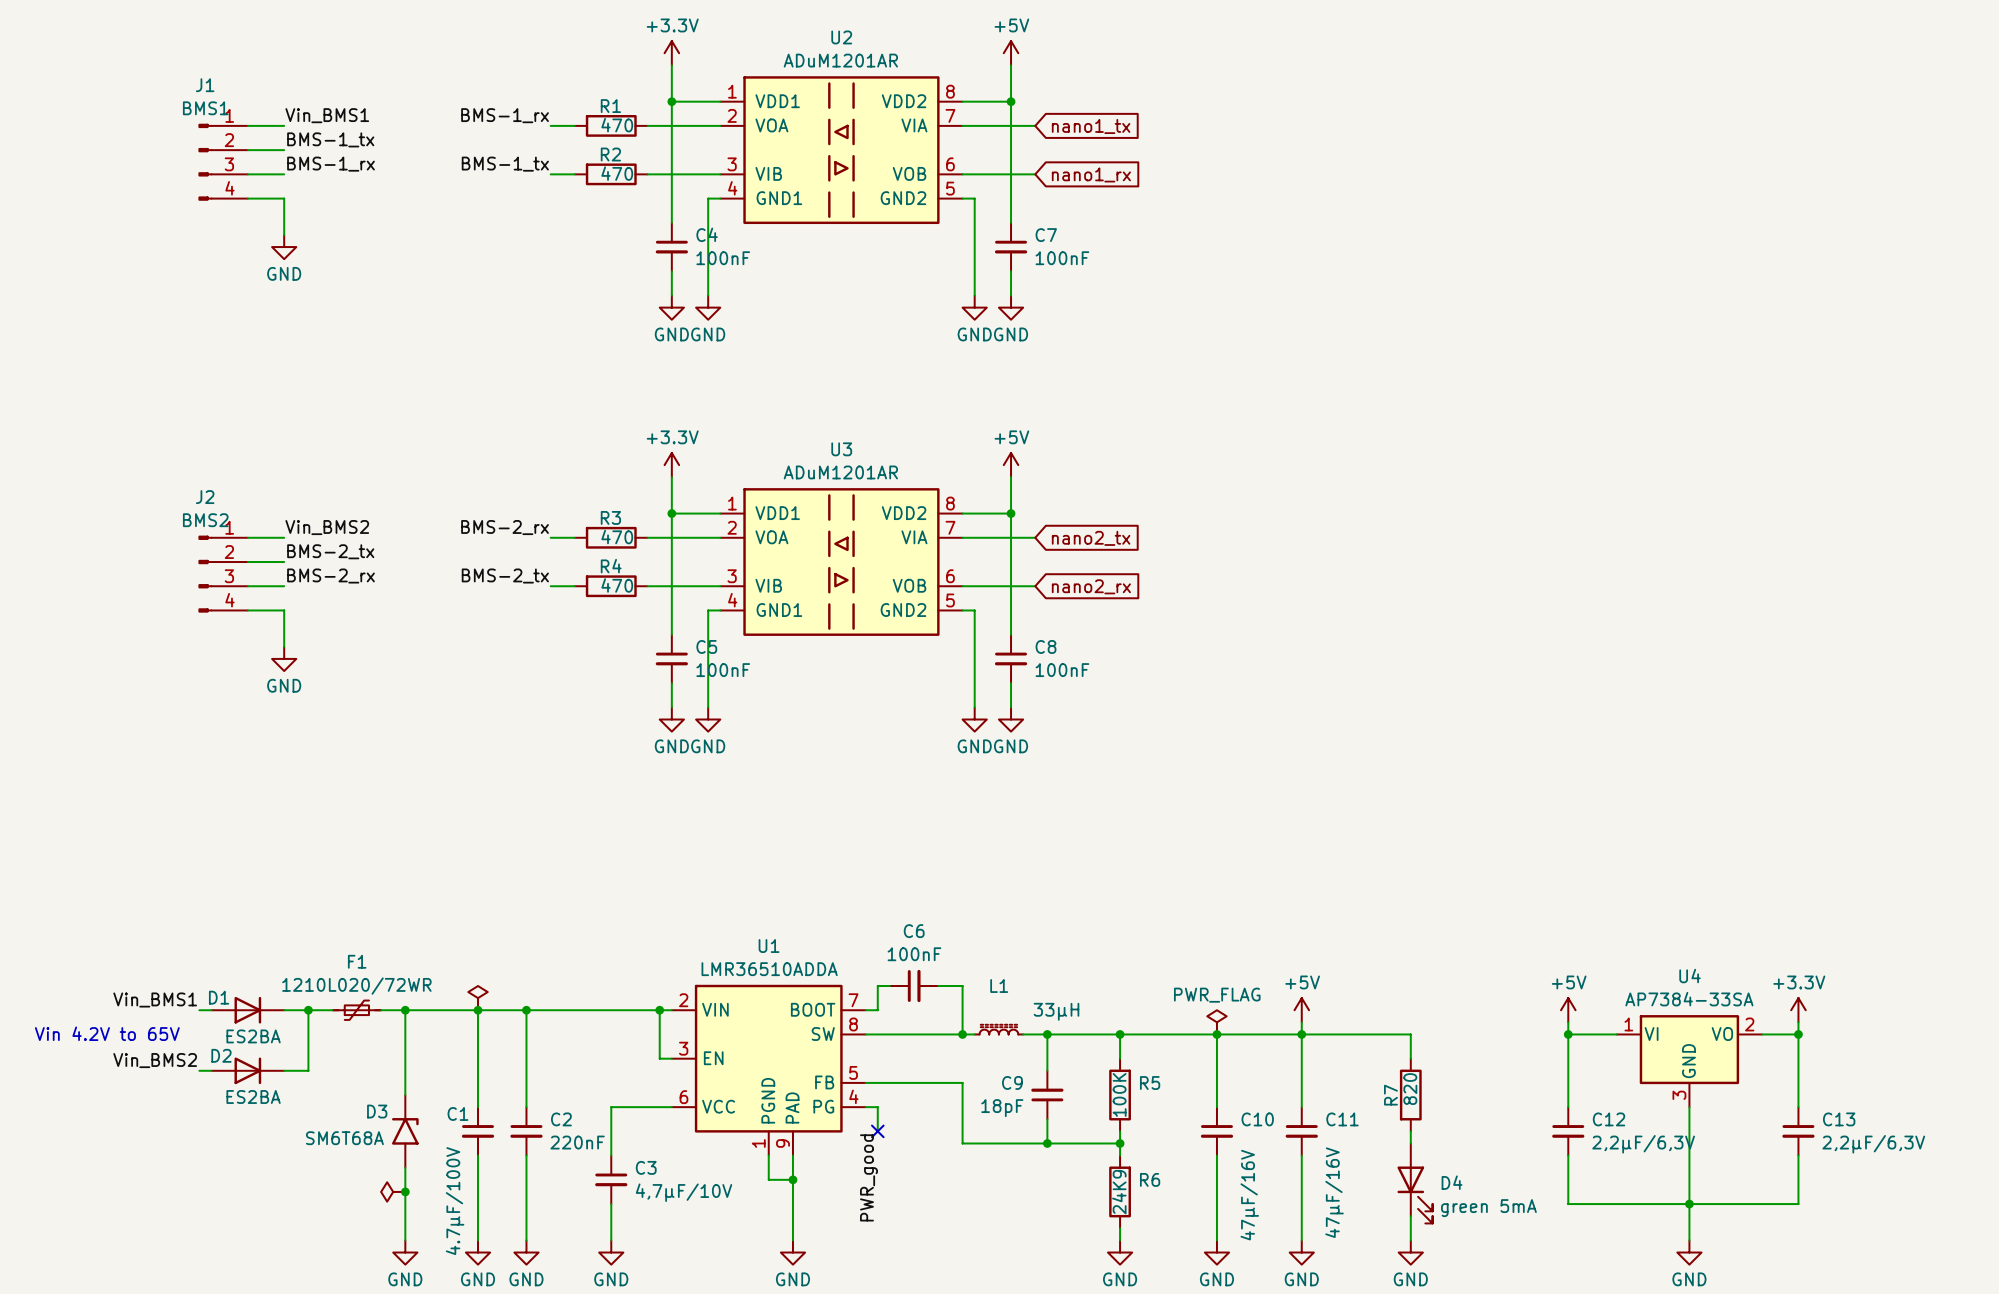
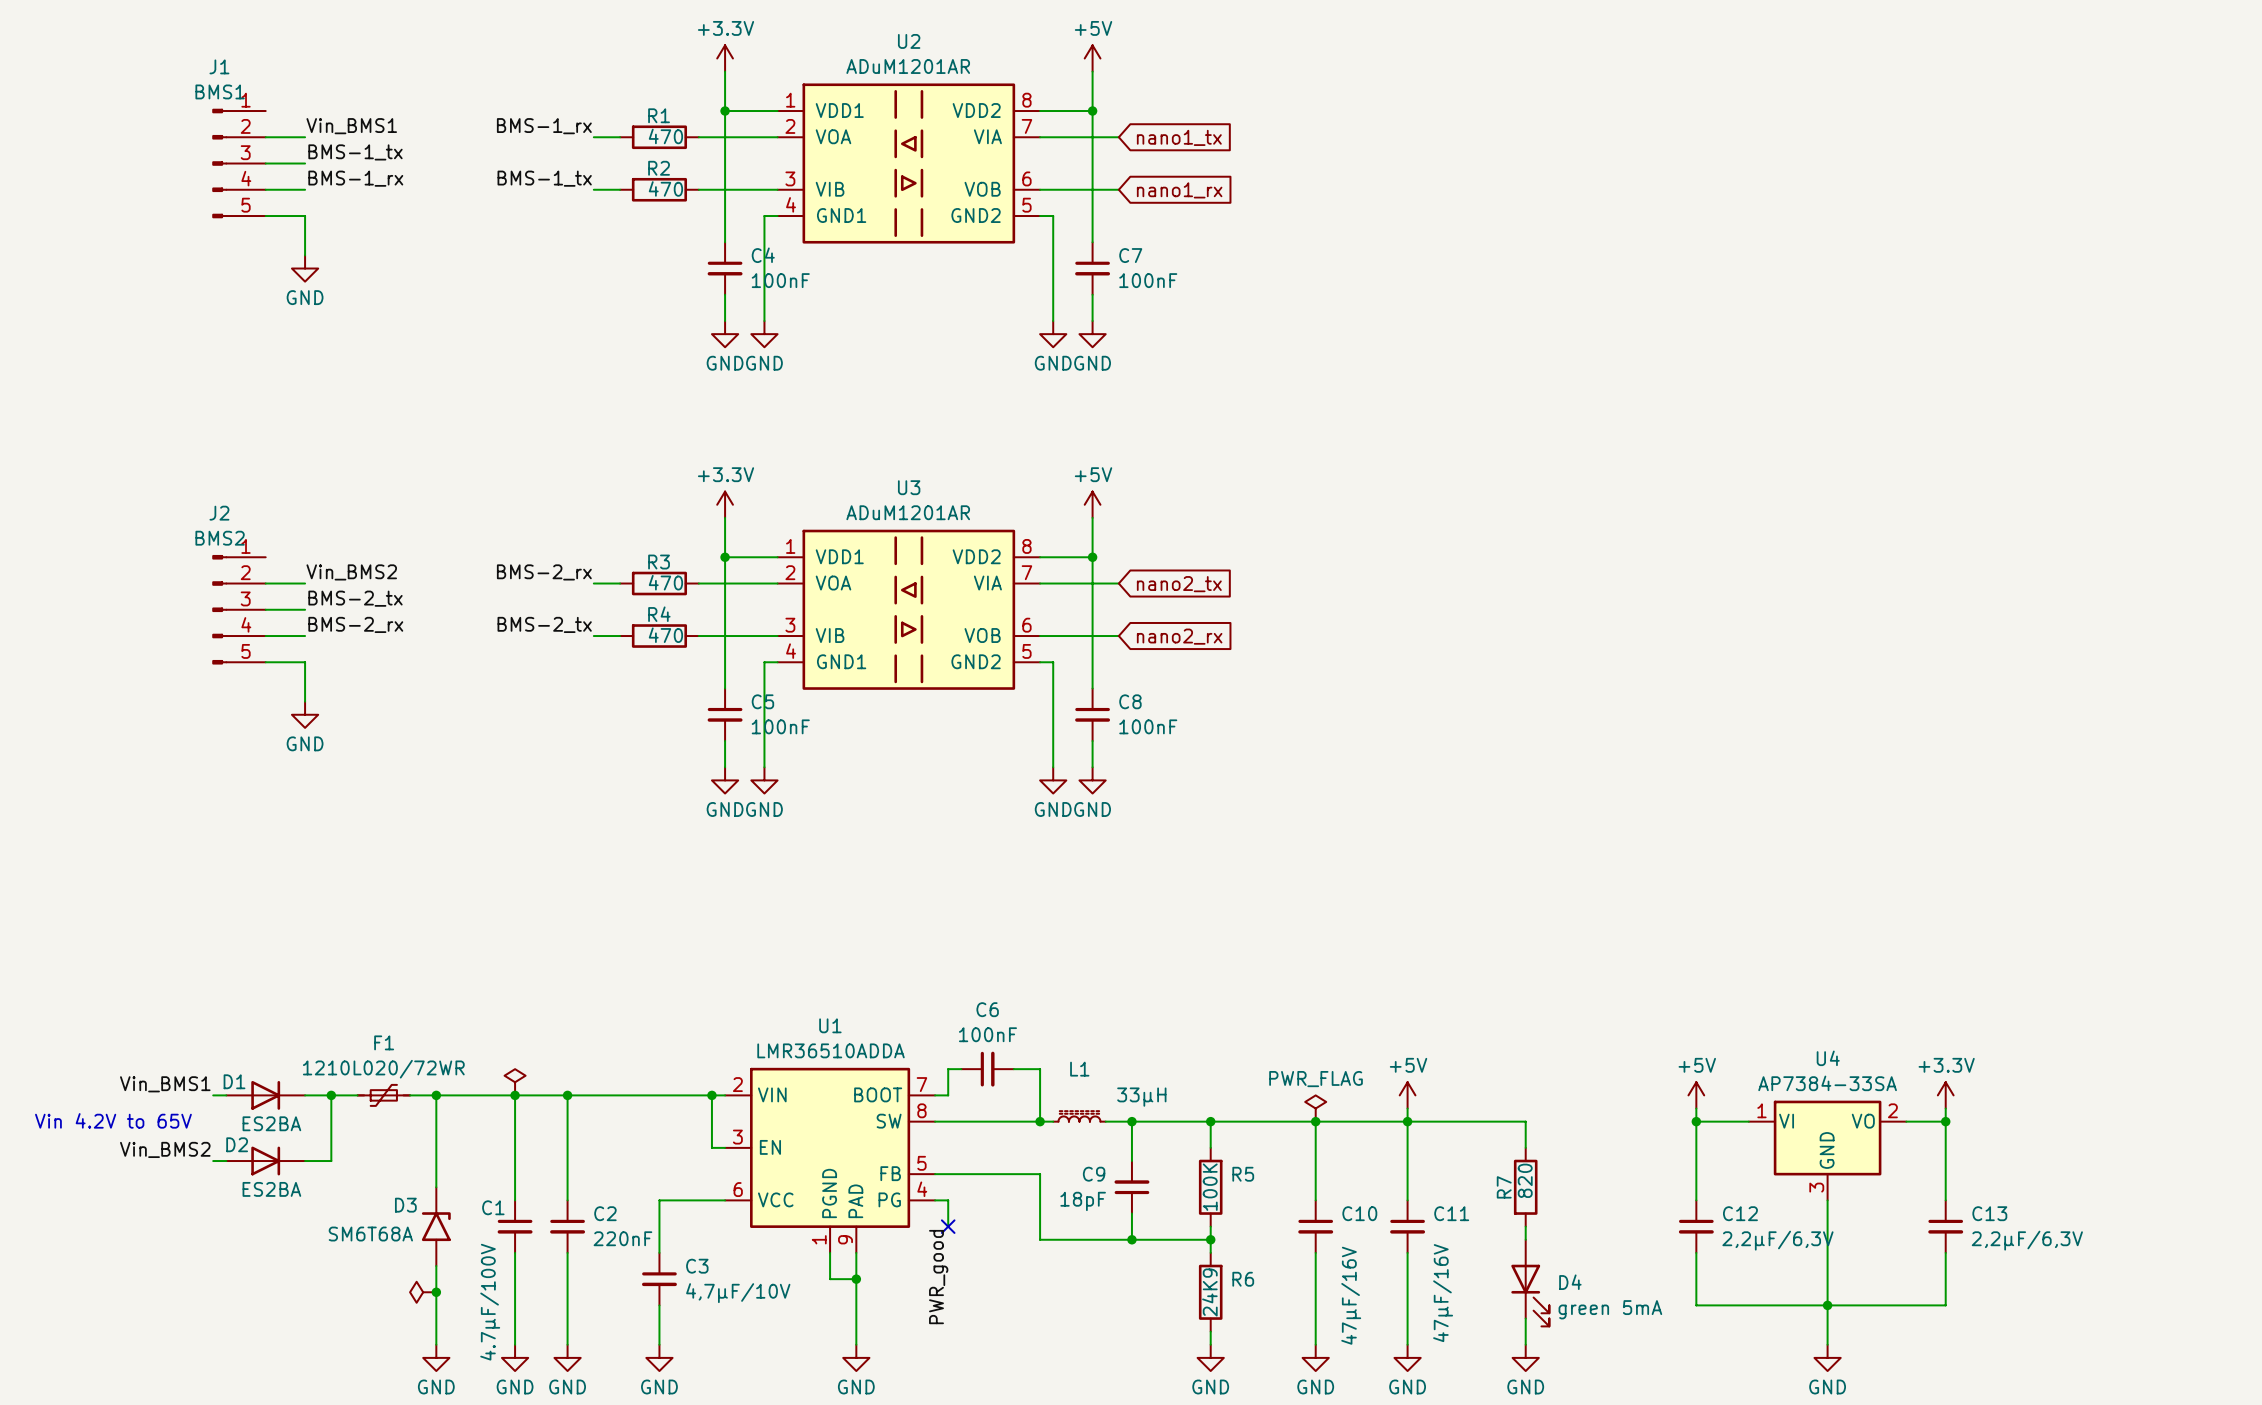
J1 symbol: [198, 123, 248, 201] -> [212, 108, 266, 219]
J2 symbol: [198, 535, 248, 613] -> [212, 555, 266, 665]

